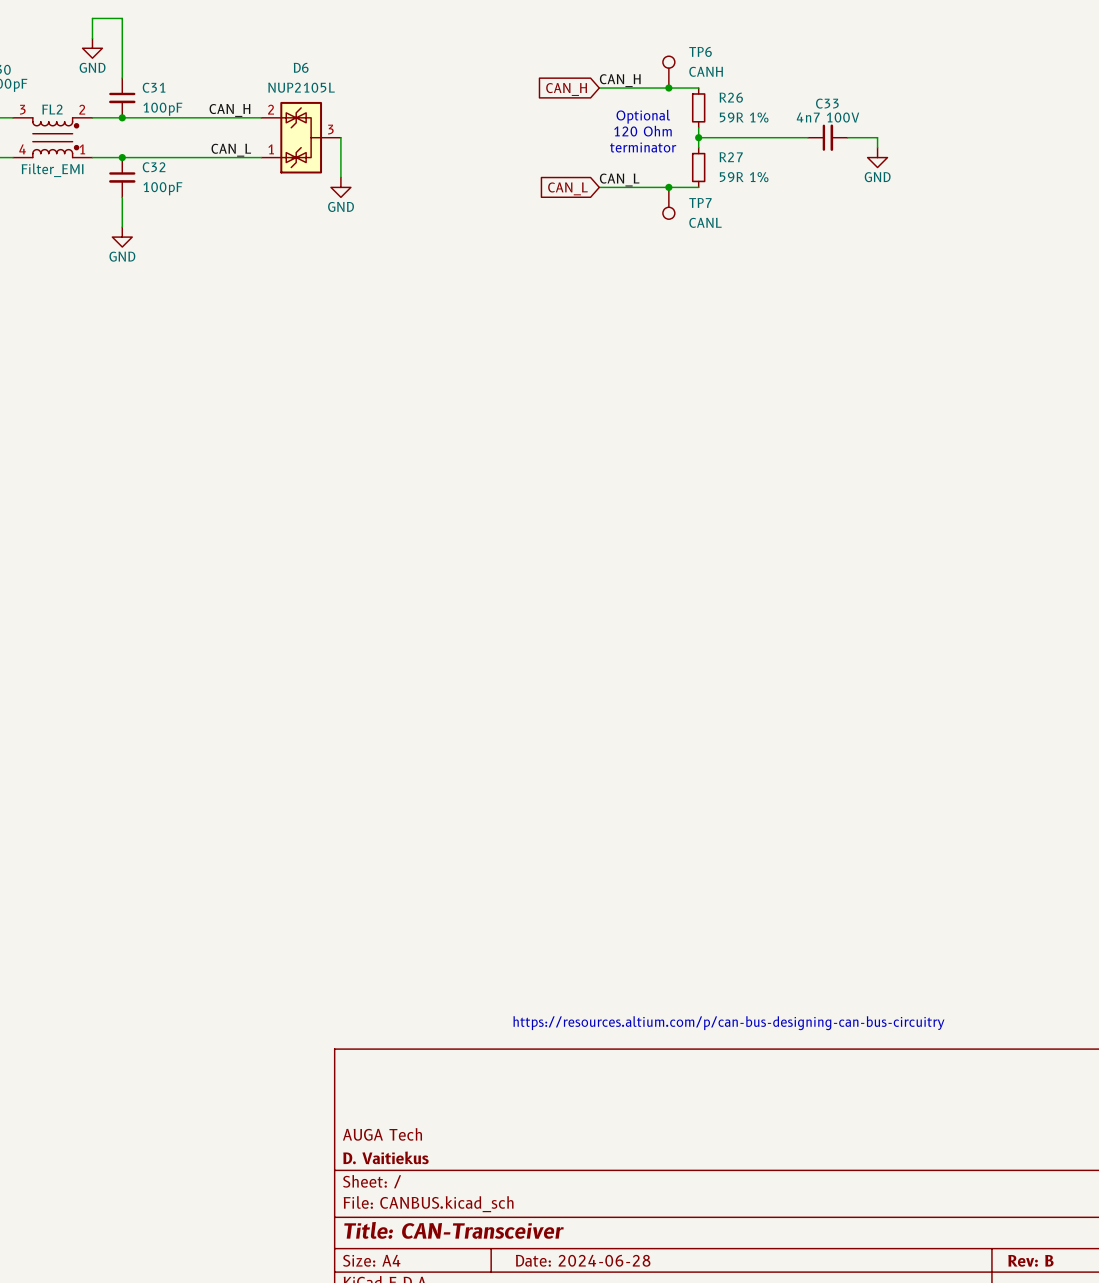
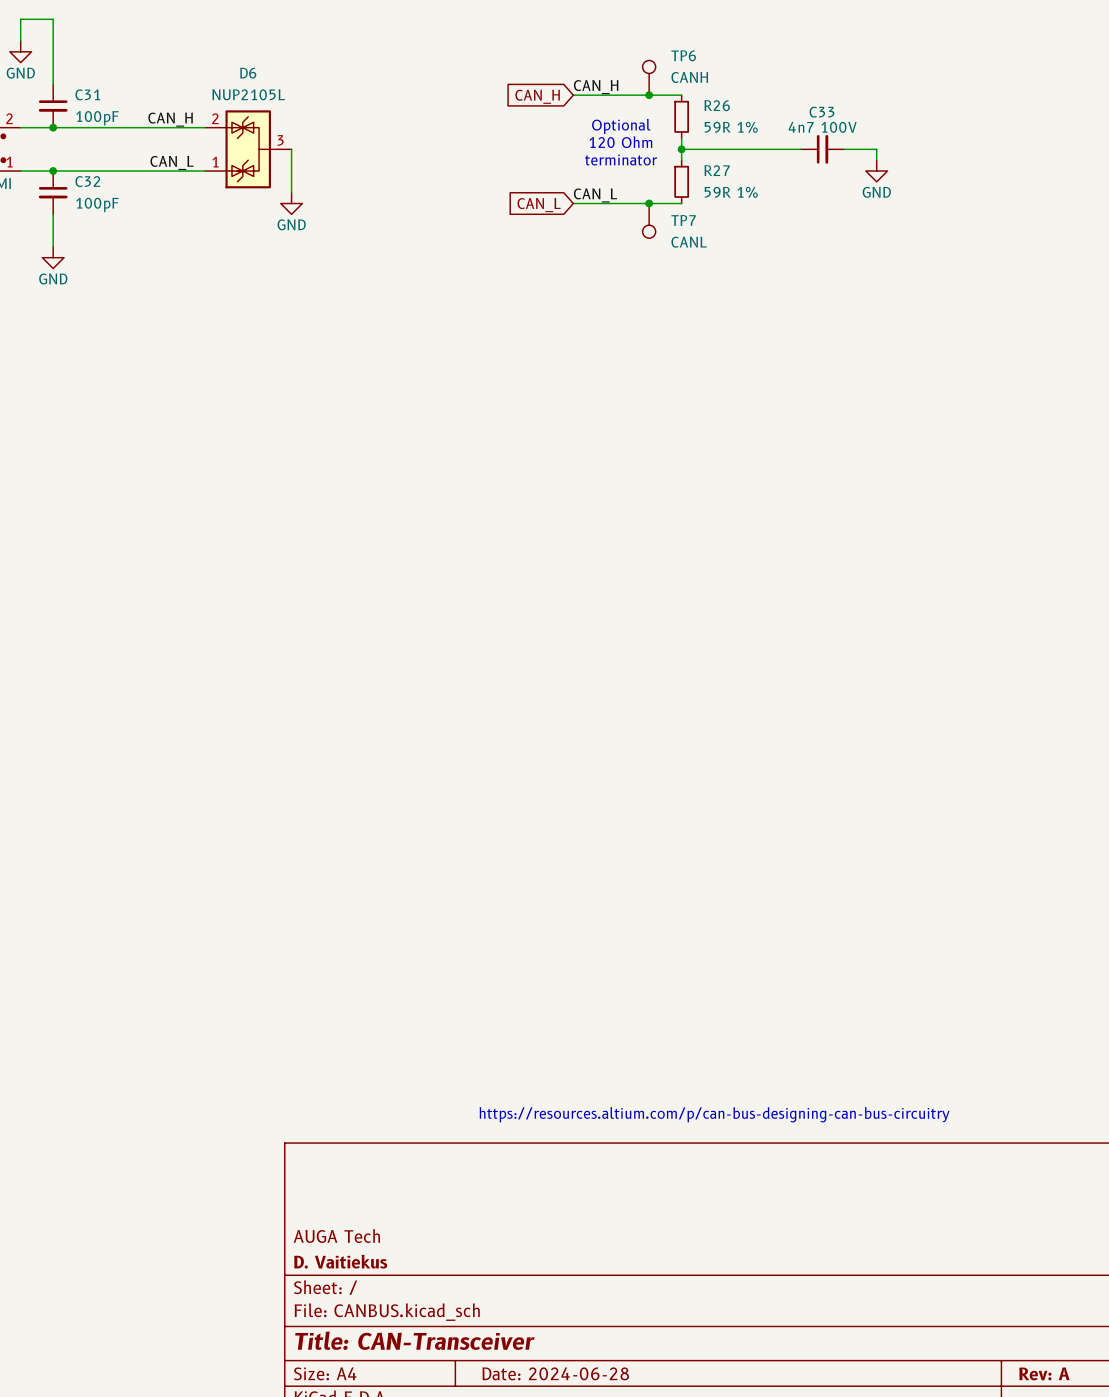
title block: Rev: B (1030, 1260) -> Rev: A (1044, 1373)

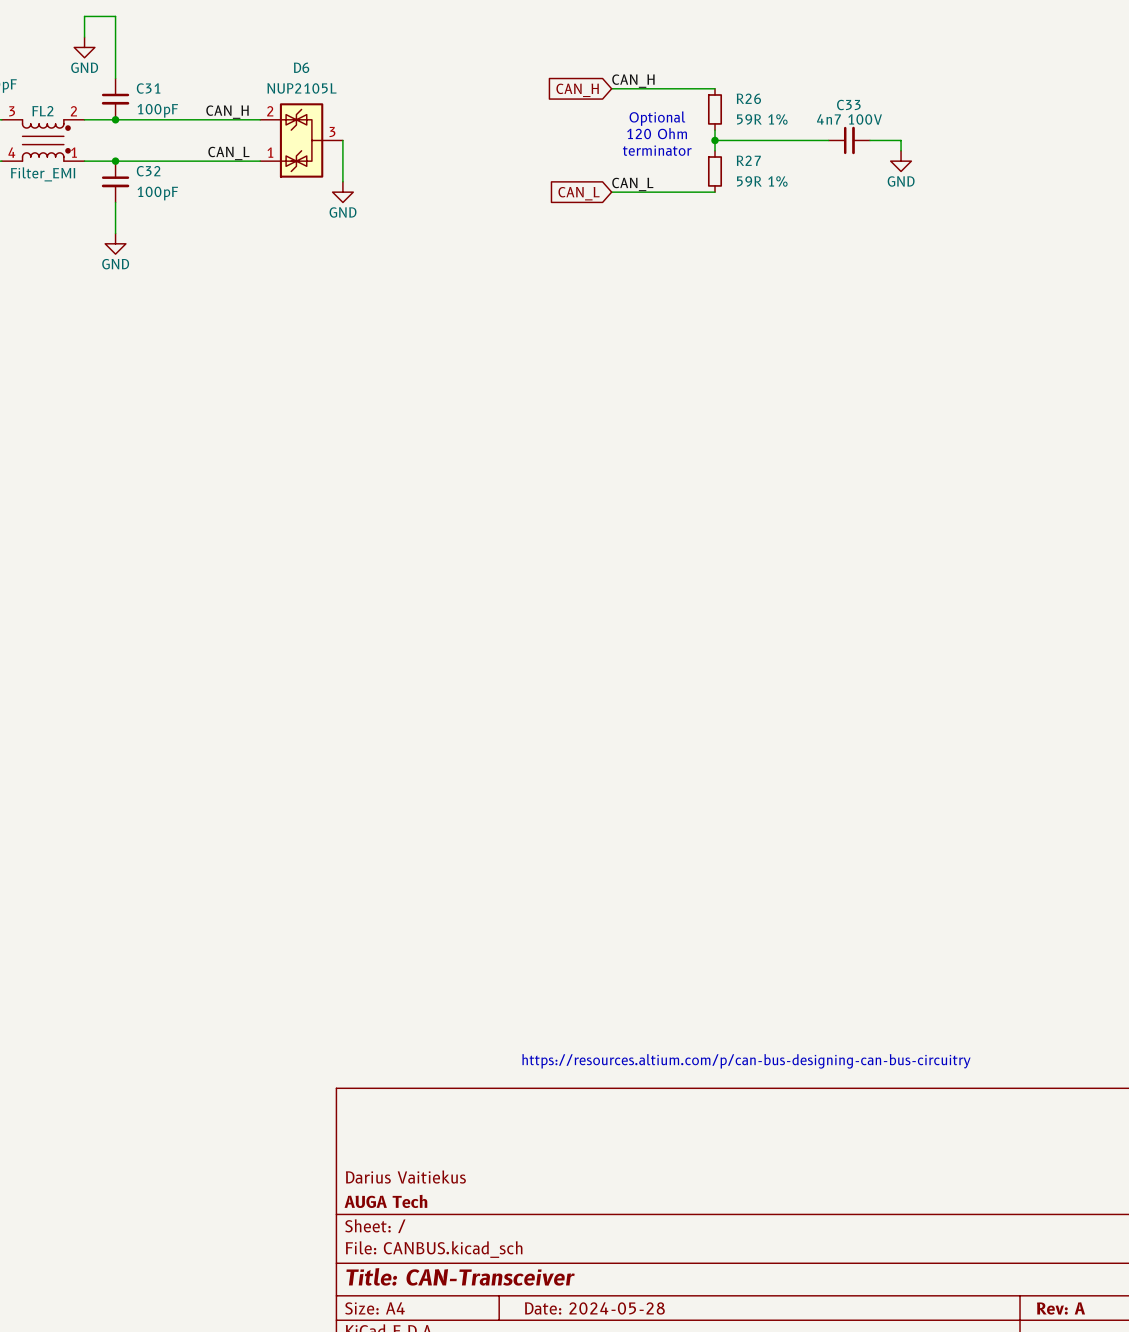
TP6: CANH (649, 77) -> none
junction: (649, 95) -> none
junction: (649, 203) -> none
TP7: CANL (649, 220) -> none
title block: AUGA Tech (336, 1236) -> Darius Vaitiekus (405, 1177)
title block: D. Vaitiekus (340, 1261) -> AUGA Tech (385, 1201)
title block: Date: 2024-06-28 (555, 1373) -> Date: 2024-05-28 (594, 1308)

